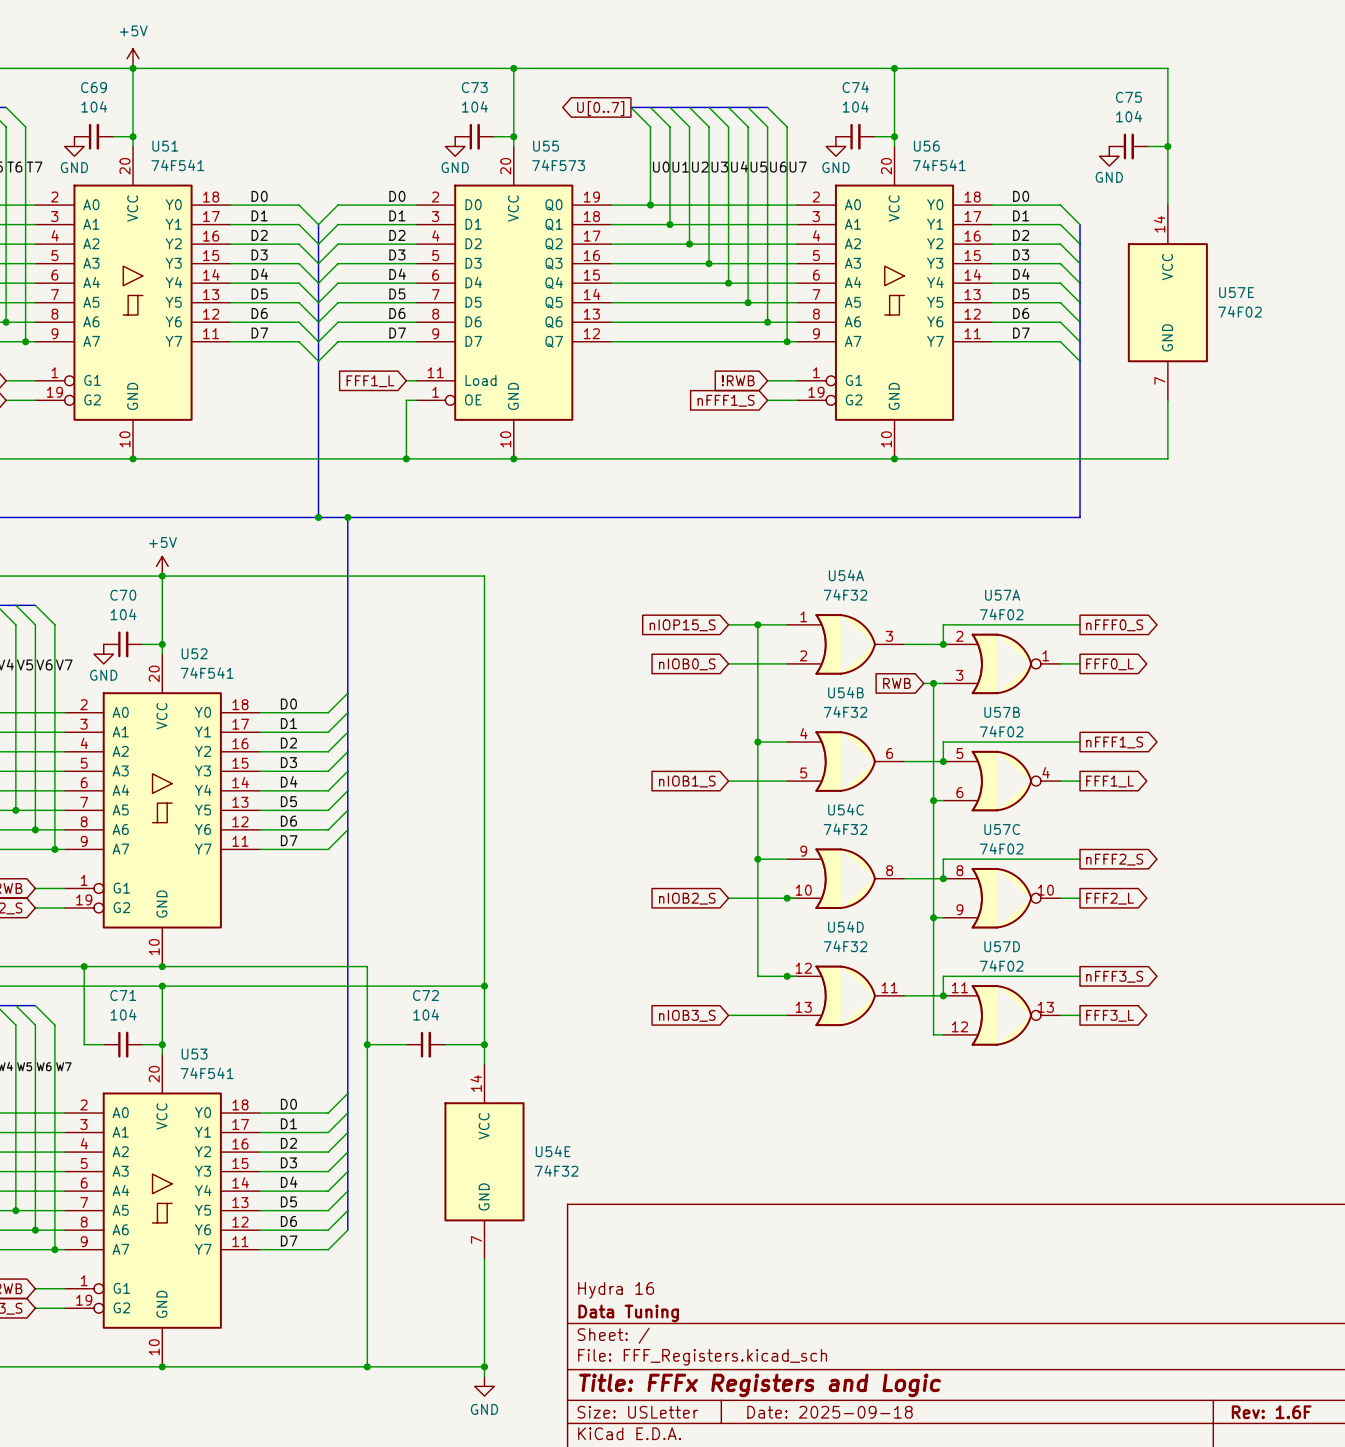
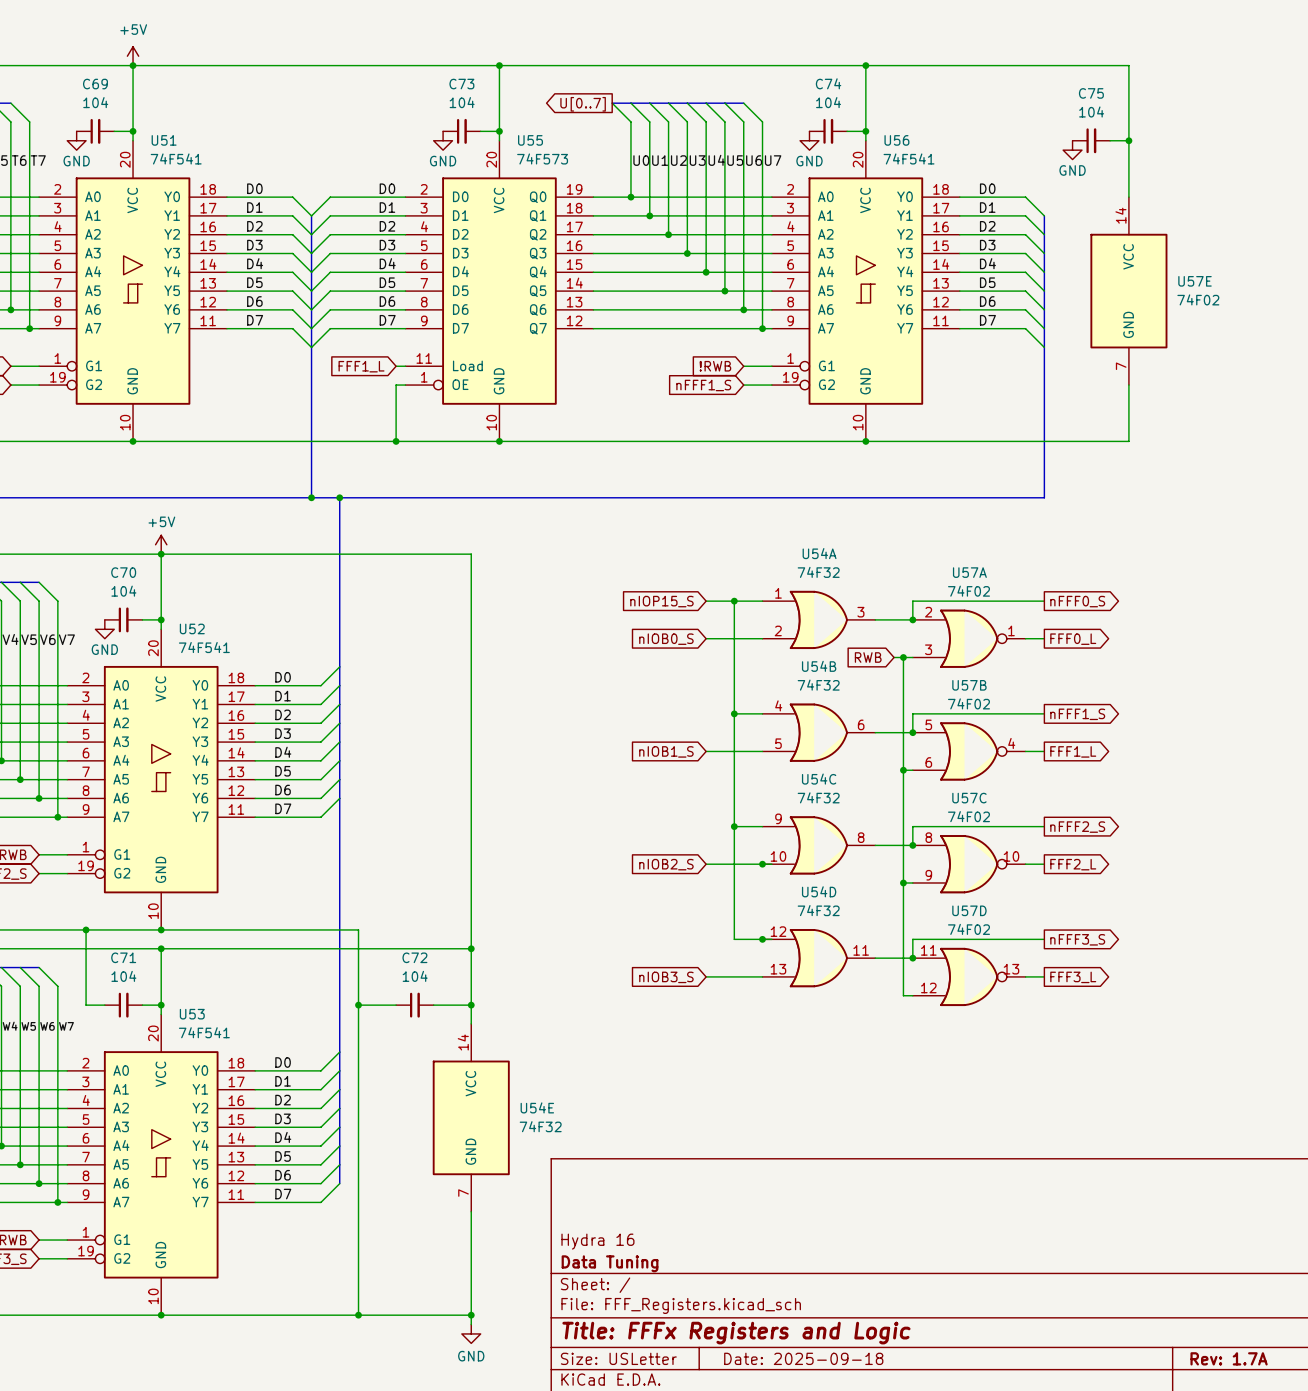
title block: Rev: 1.6F (1271, 1412) -> Rev: 1.7A (1229, 1358)

